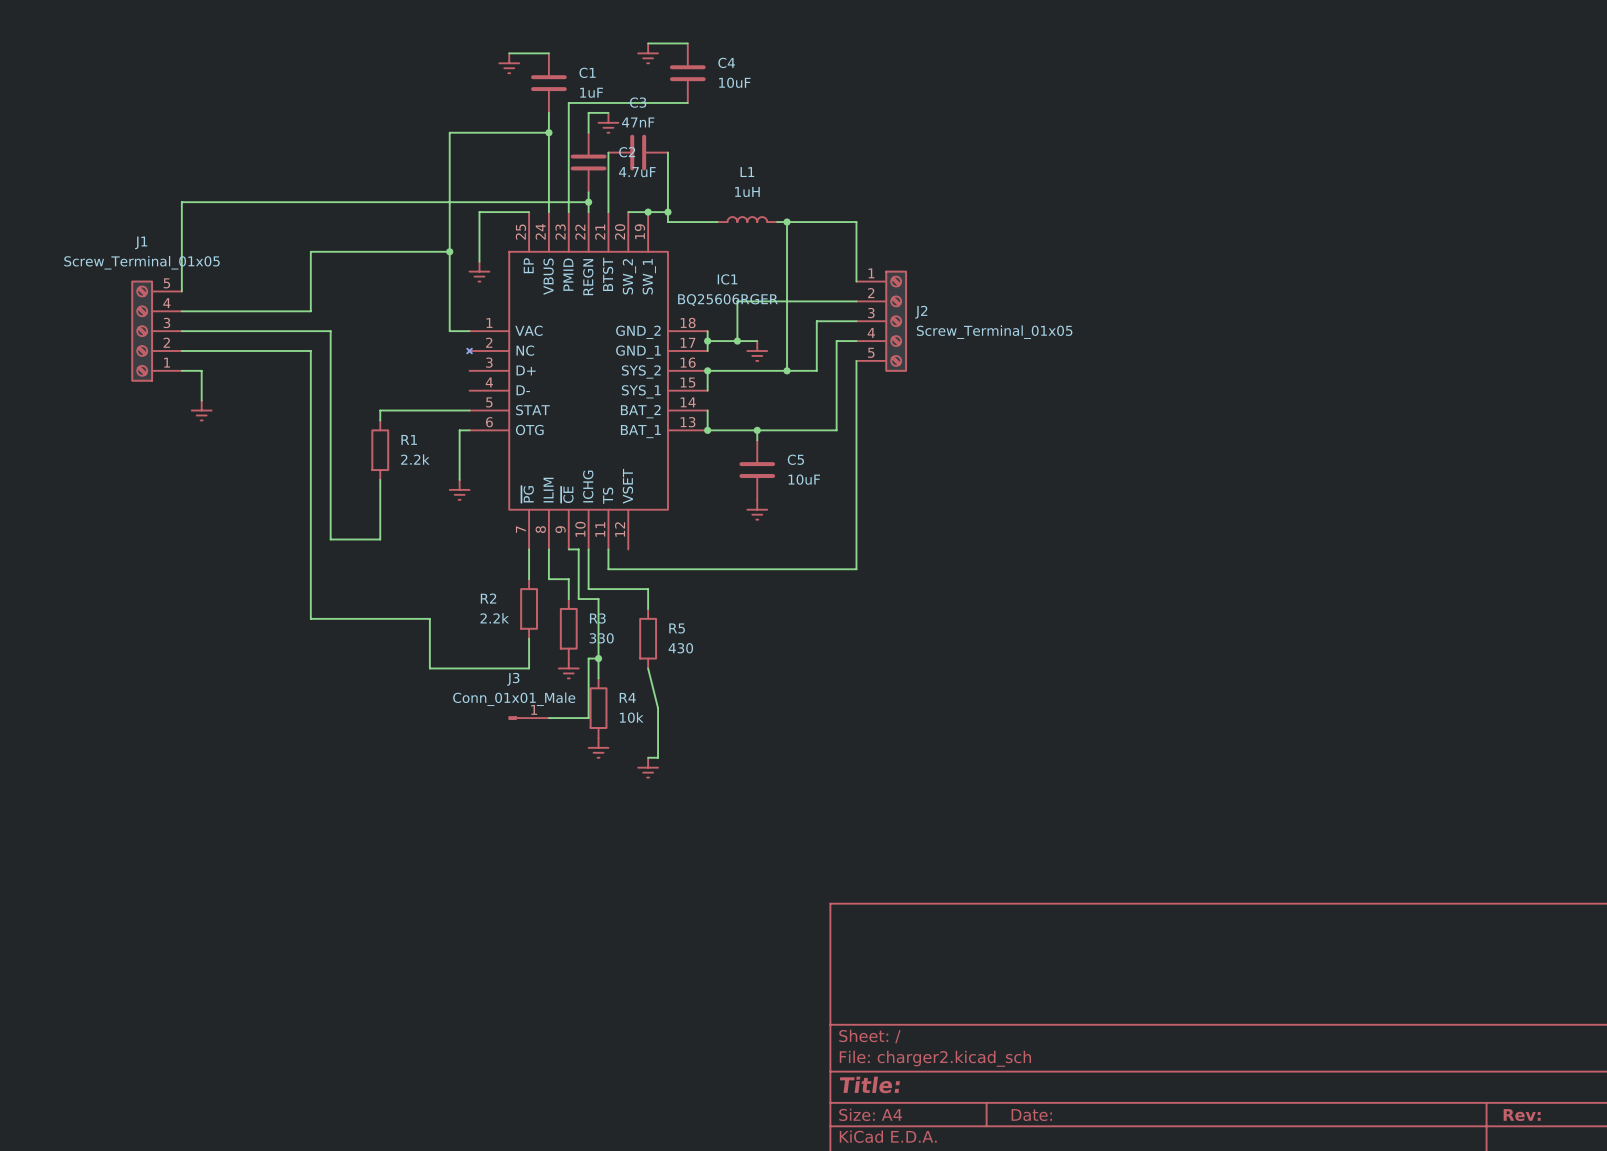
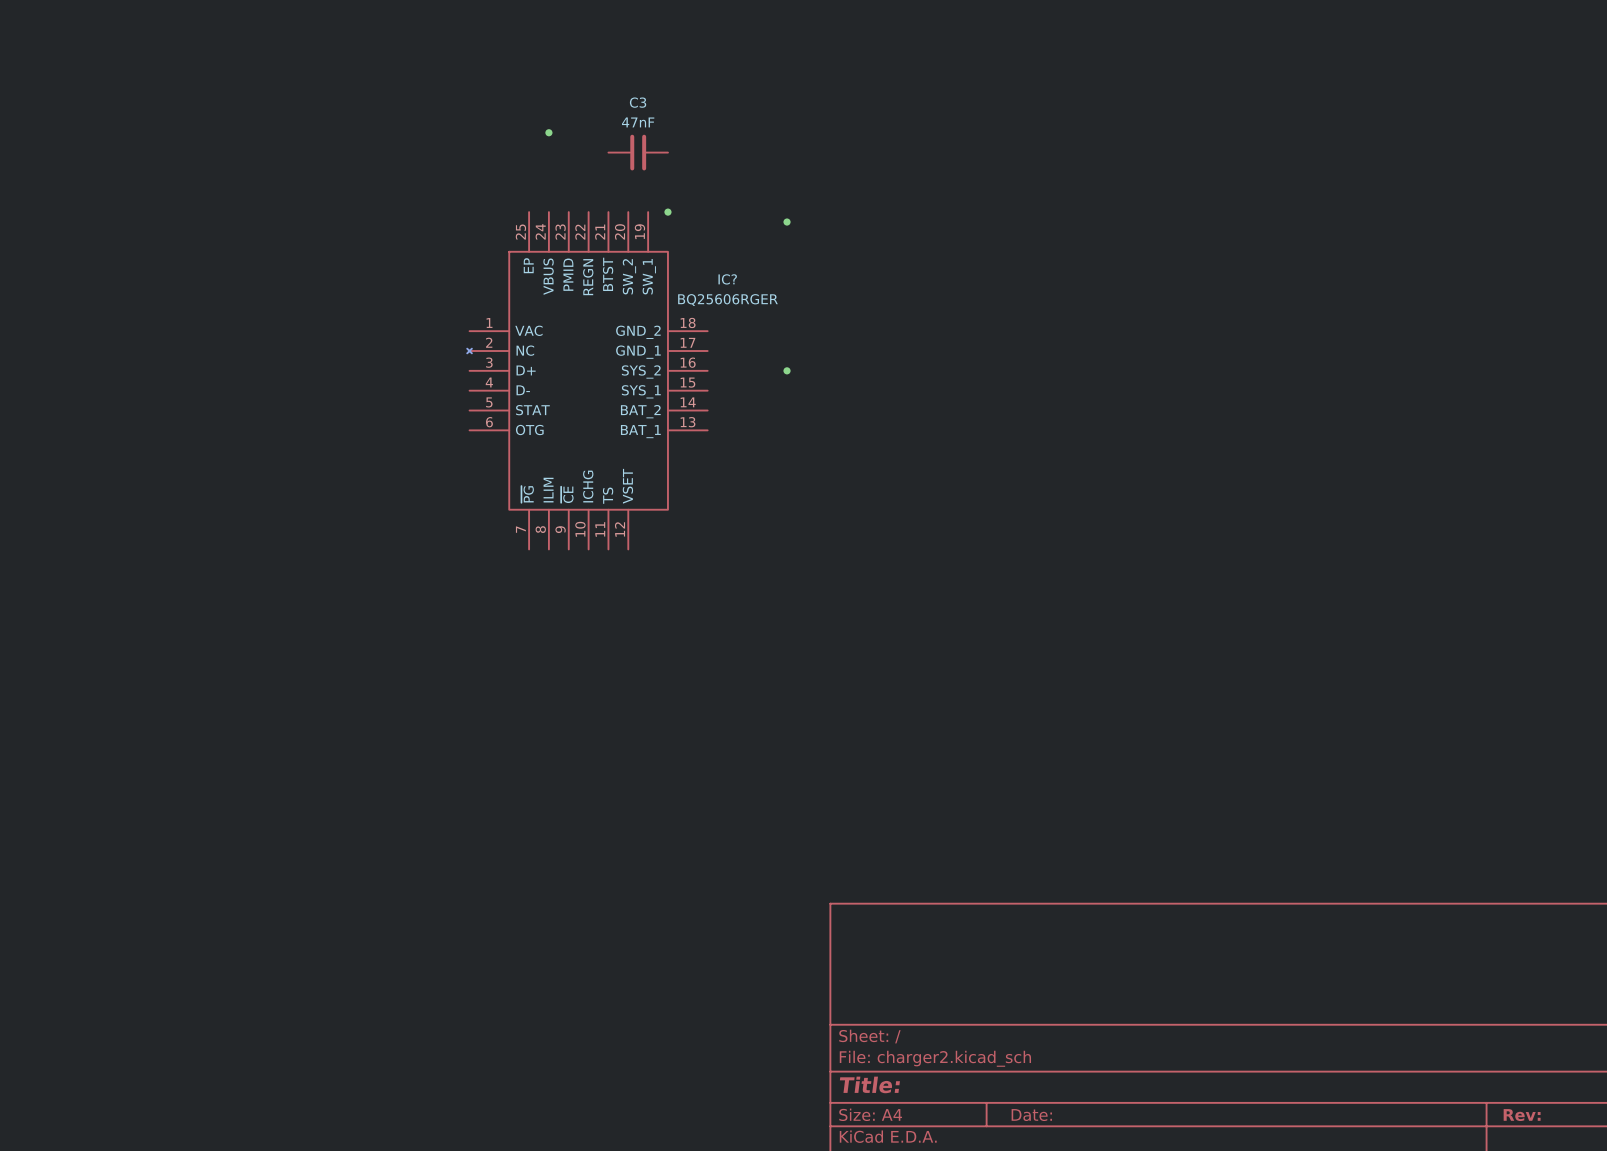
wire: (648, 43) (687, 43) -> none
wire: (509, 53) (548, 53) -> none
power symbol: (648, 53) -> none
power symbol: (509, 63) -> none
C4: 10uF (687, 73) -> none
C1: 1uF (548, 83) -> none
wire: (687, 102) (568, 102) (568, 212) -> none
wire: (548, 112) (548, 212) -> none
wire: (608, 112) (588, 112) (588, 132) -> none
power symbol: (608, 122) -> none
wire: (548, 132) (449, 132) (449, 331) (469, 331) -> none
wire: (608, 152) (608, 212) -> none
wire: (667, 152) (667, 222) (717, 222) -> none
C2: 4.7uF (588, 162) -> none
wire: (588, 192) (588, 212) -> none
wire: (588, 202) (181, 202) (181, 291) -> none
junction: (588, 202) -> none
wire: (529, 212) (479, 212) (479, 261) -> none
wire: (628, 212) (667, 212) -> none
junction: (648, 212) -> none
L1: 1uH (747, 219) -> none
wire: (777, 222) (856, 222) (856, 281) -> none
wire: (787, 222) (787, 370) -> none
wire: (449, 251) (310, 251) (310, 311) (181, 311) -> none
junction: (449, 251) -> none
power symbol: (479, 271) -> none
IC1 name: IC1 (727, 279) -> IC? (727, 279)
wire: (856, 301) (737, 301) (737, 341) -> none
wire: (856, 321) (816, 321) (816, 370) (707, 370) (707, 390) -> none
J2: Screw_Terminal_01x05 (881, 321) -> none
J1: Screw_Terminal_01x05 (156, 331) -> none
wire: (181, 331) (330, 331) (330, 539) (380, 539) (380, 479) -> none
wire: (707, 331) (707, 351) -> none
wire: (707, 341) (757, 341) -> none
junction: (707, 341) -> none
junction: (737, 341) -> none
wire: (856, 341) (836, 341) (836, 430) (707, 430) (707, 410) -> none
wire: (181, 351) (310, 351) (310, 618) (429, 618) (429, 668) (529, 668) (529, 638) -> none
power symbol: (757, 351) -> none
wire: (856, 360) (856, 569) (608, 569) (608, 549) -> none
wire: (181, 370) (201, 370) (201, 400) -> none
junction: (707, 370) -> none
power symbol: (201, 410) -> none
wire: (469, 410) (380, 410) (380, 420) -> none
wire: (469, 430) (459, 430) (459, 479) -> none
junction: (707, 430) -> none
wire: (757, 430) (757, 440) -> none
junction: (757, 430) -> none
R1: 2.2k (380, 450) -> none
C5: 10uF (757, 470) -> none
power symbol: (459, 489) -> none
power symbol: (757, 509) -> none
wire: (529, 549) (529, 579) -> none
wire: (548, 549) (548, 579) (568, 579) (568, 599) -> none
wire: (568, 549) (578, 549) (578, 599) (598, 599) (598, 678) -> none
wire: (588, 549) (588, 589) (648, 589) (648, 608) -> none
R2: 2.2k (529, 608) -> none
R3: 330 (568, 628) -> none
R5: 430 (648, 638) -> none
wire: (598, 658) (588, 658) (588, 718) (548, 718) -> none
junction: (598, 658) -> none
power symbol: (568, 668) -> none
wire: (648, 668) (658, 708) (658, 757) (648, 757) -> none
R4: 10k (598, 708) -> none
J3: Conn_01x01_Male (528, 718) -> none
power symbol: (598, 747) -> none
power symbol: (648, 767) -> none

